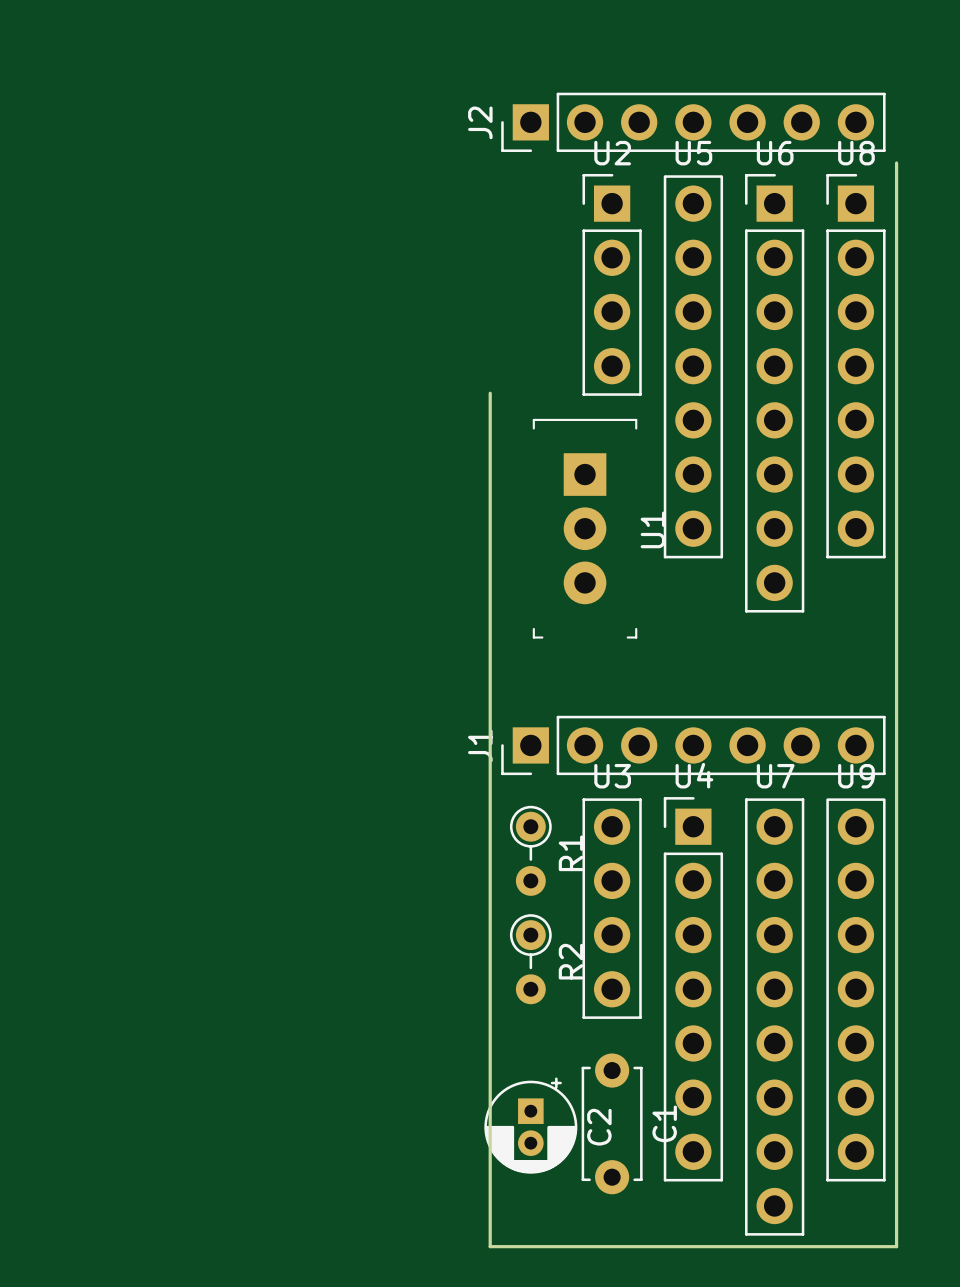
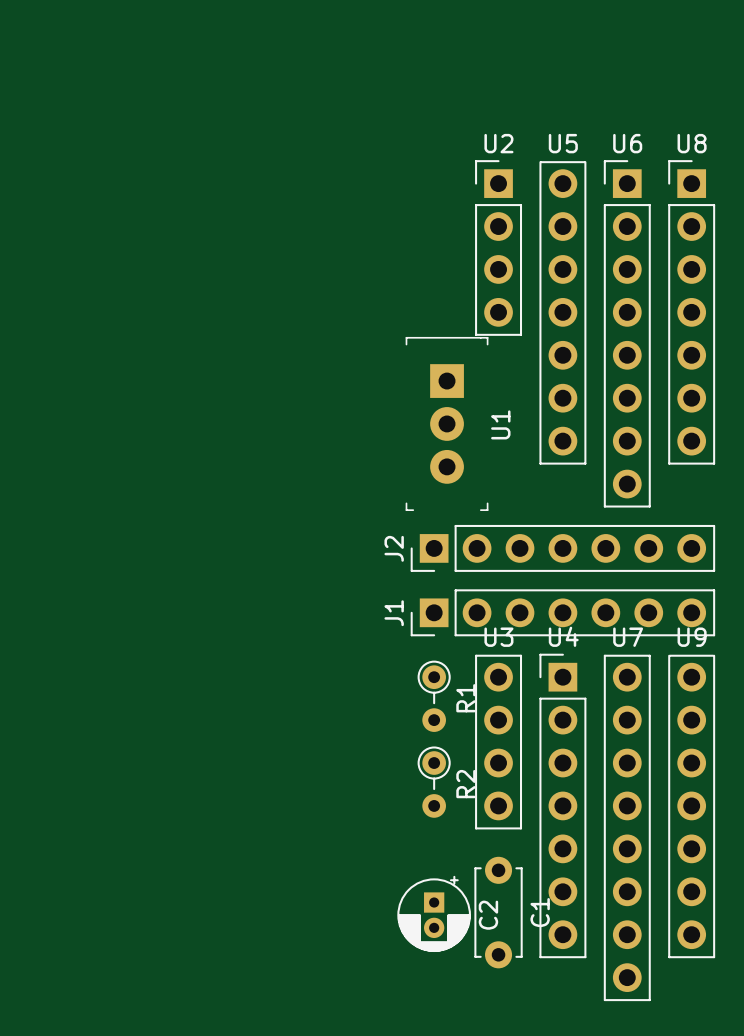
J2 position: (693, 122) -> (562, 548)
board edge: (896, 162) (896, 1246) (490, 1246) (490, 393) -> none
U1 position: (585, 528) -> (447, 423)

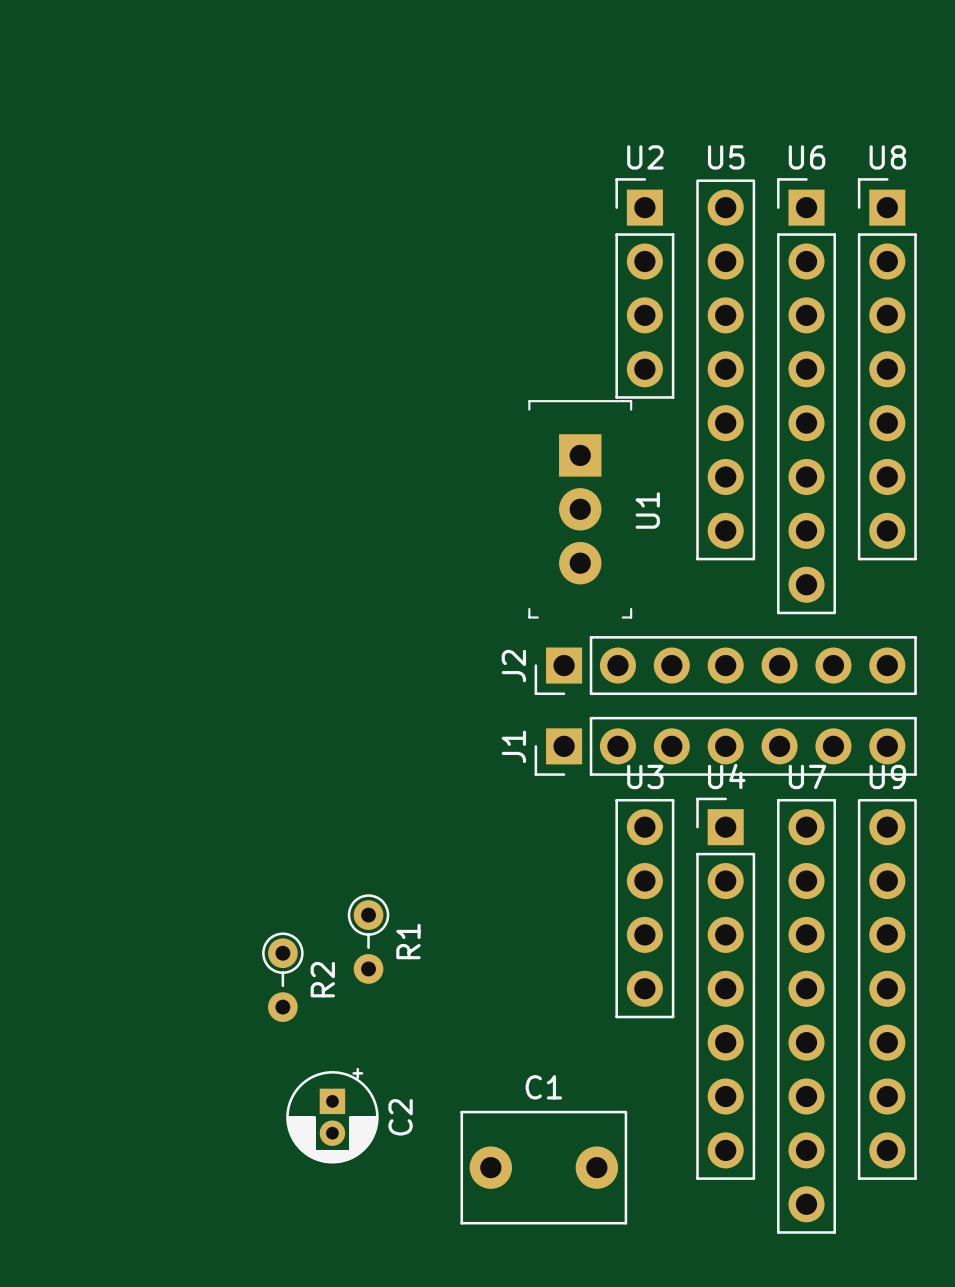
R1 position: (434, 696) -> (368, 939)
R2 position: (434, 782) -> (282, 977)
C1 footprint: [474, 856, 523, 969] -> [460, 1110, 628, 1225]
C1 name position: C1 (540, 912) -> C1 (543, 1087)
C2 position: (434, 913) -> (332, 1115)

